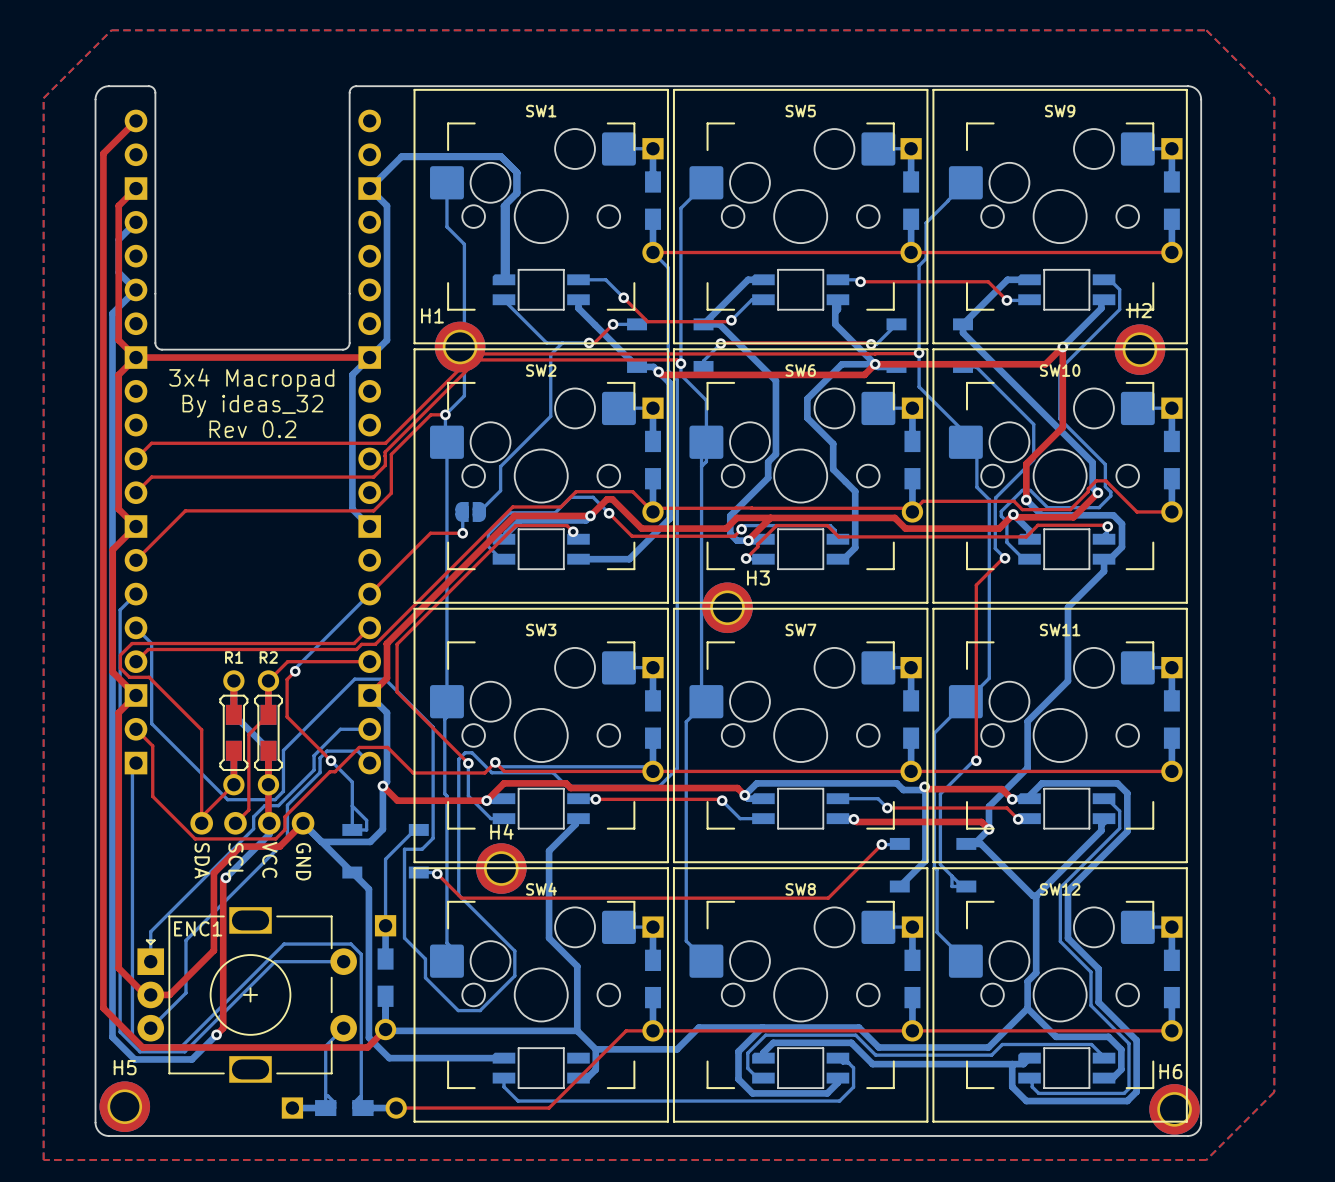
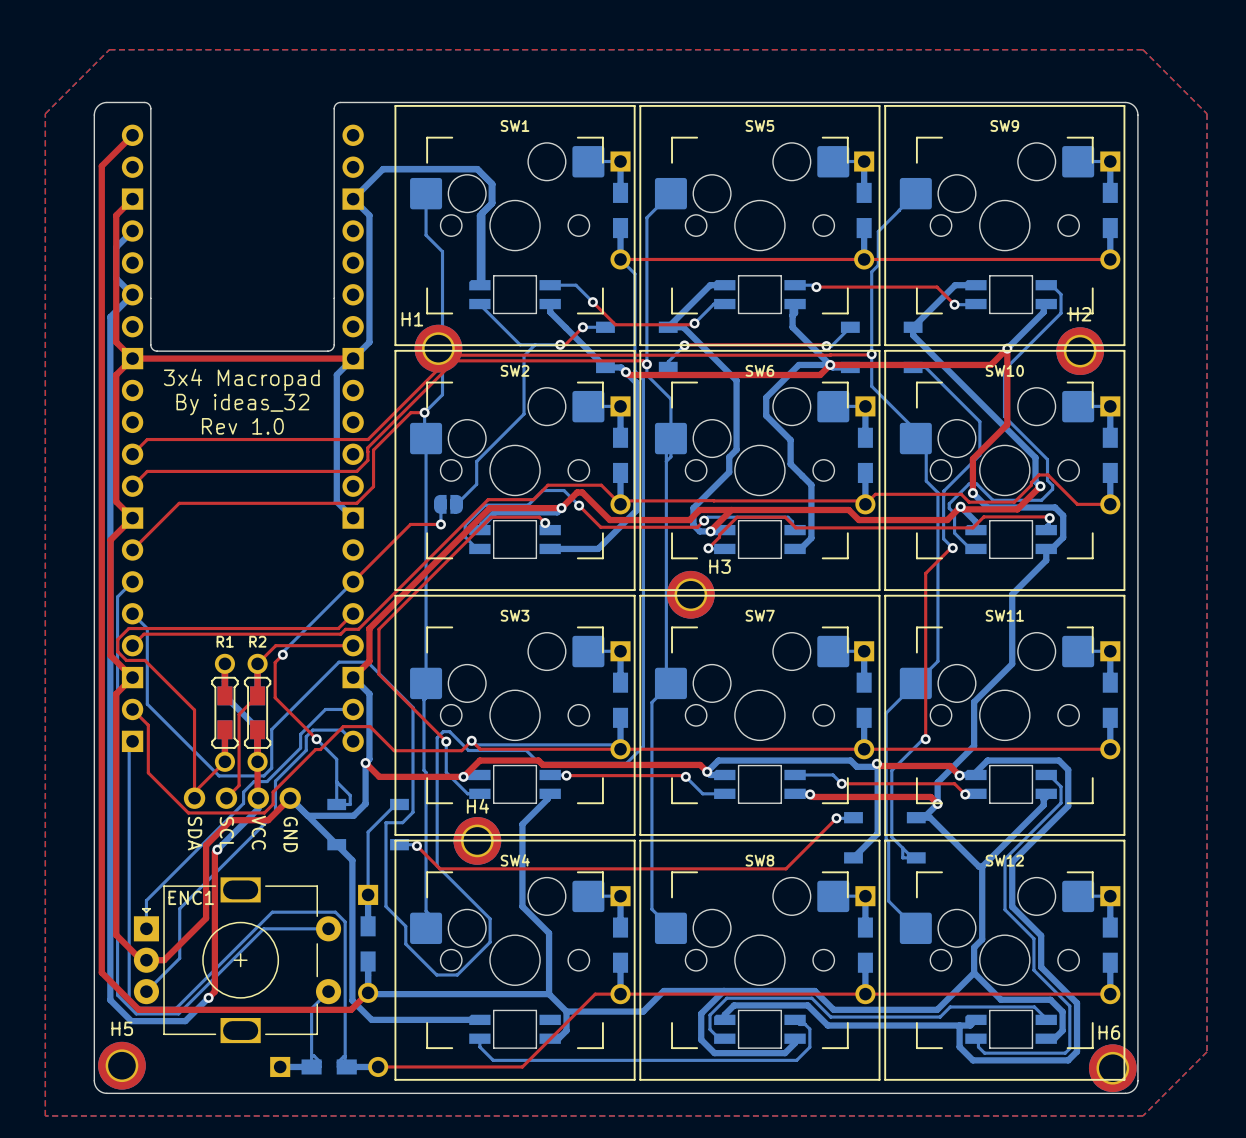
text: Rev 0.2 (252, 429) -> Rev 1.0 (242, 426)

